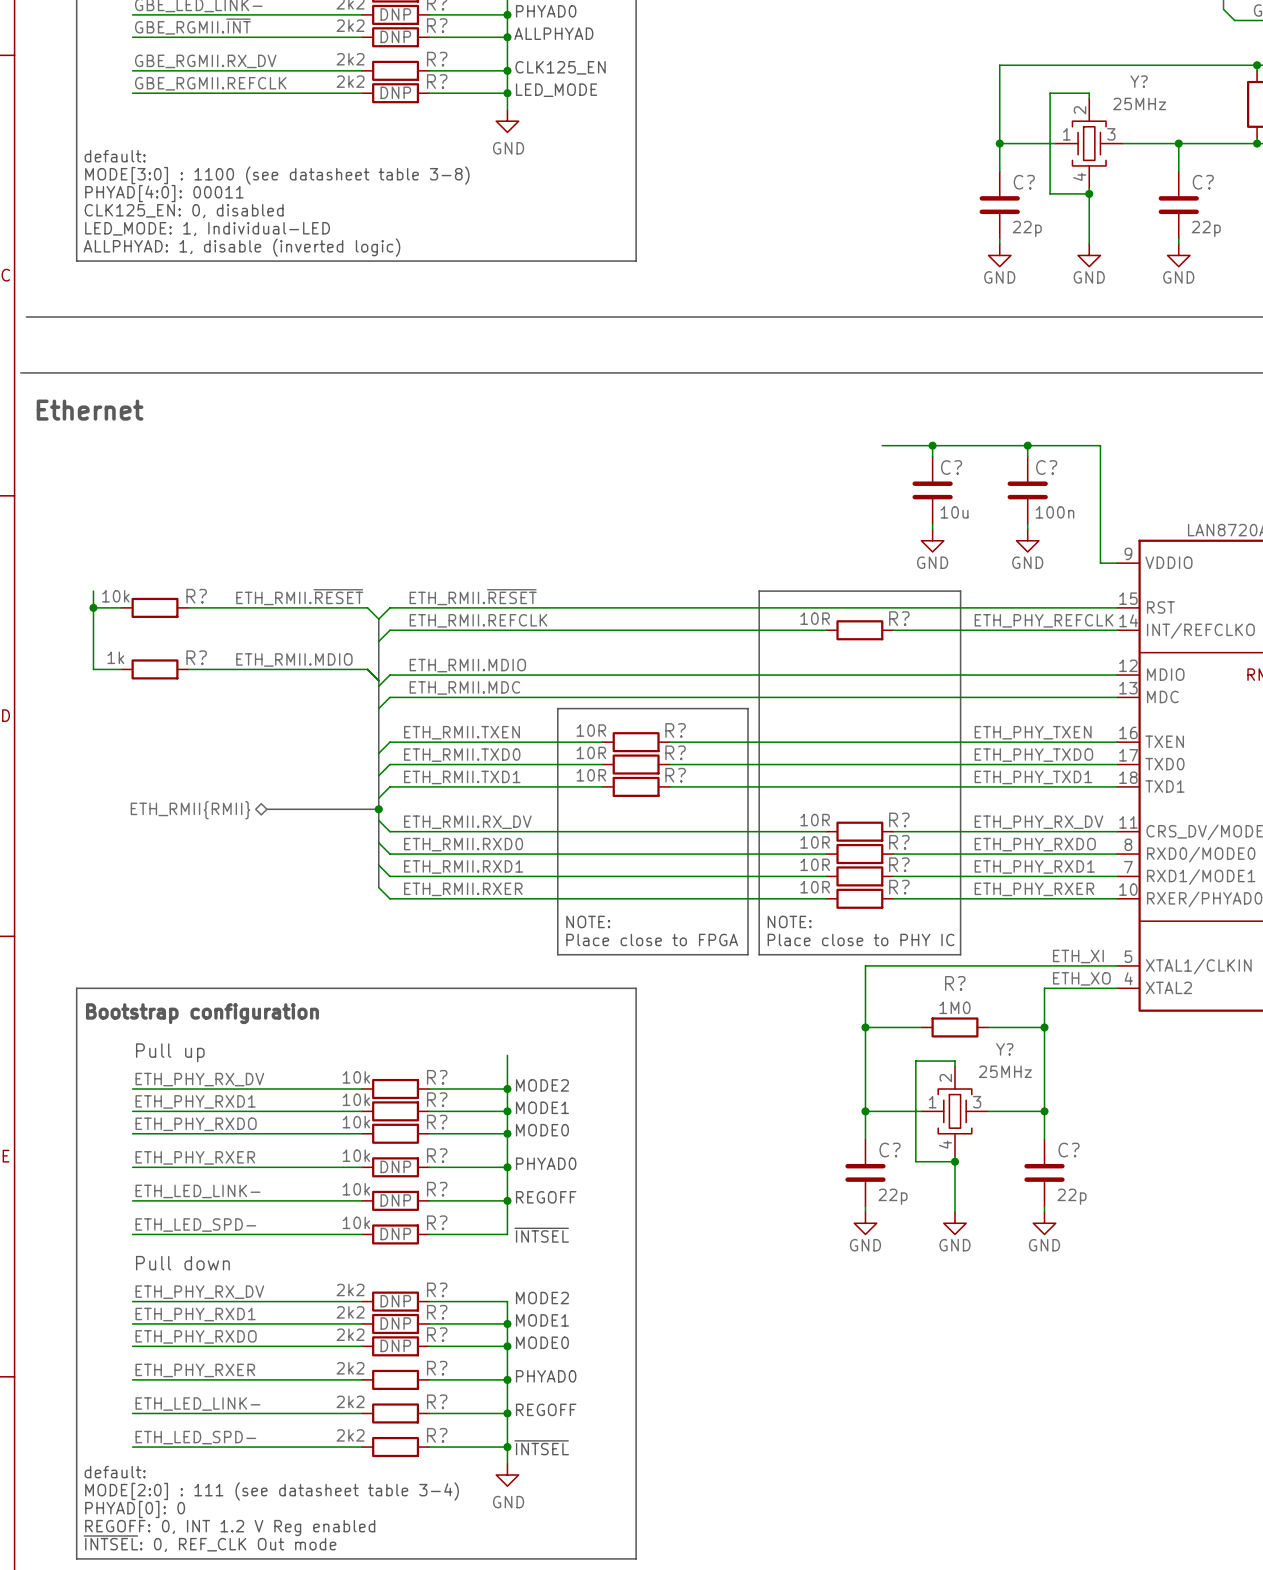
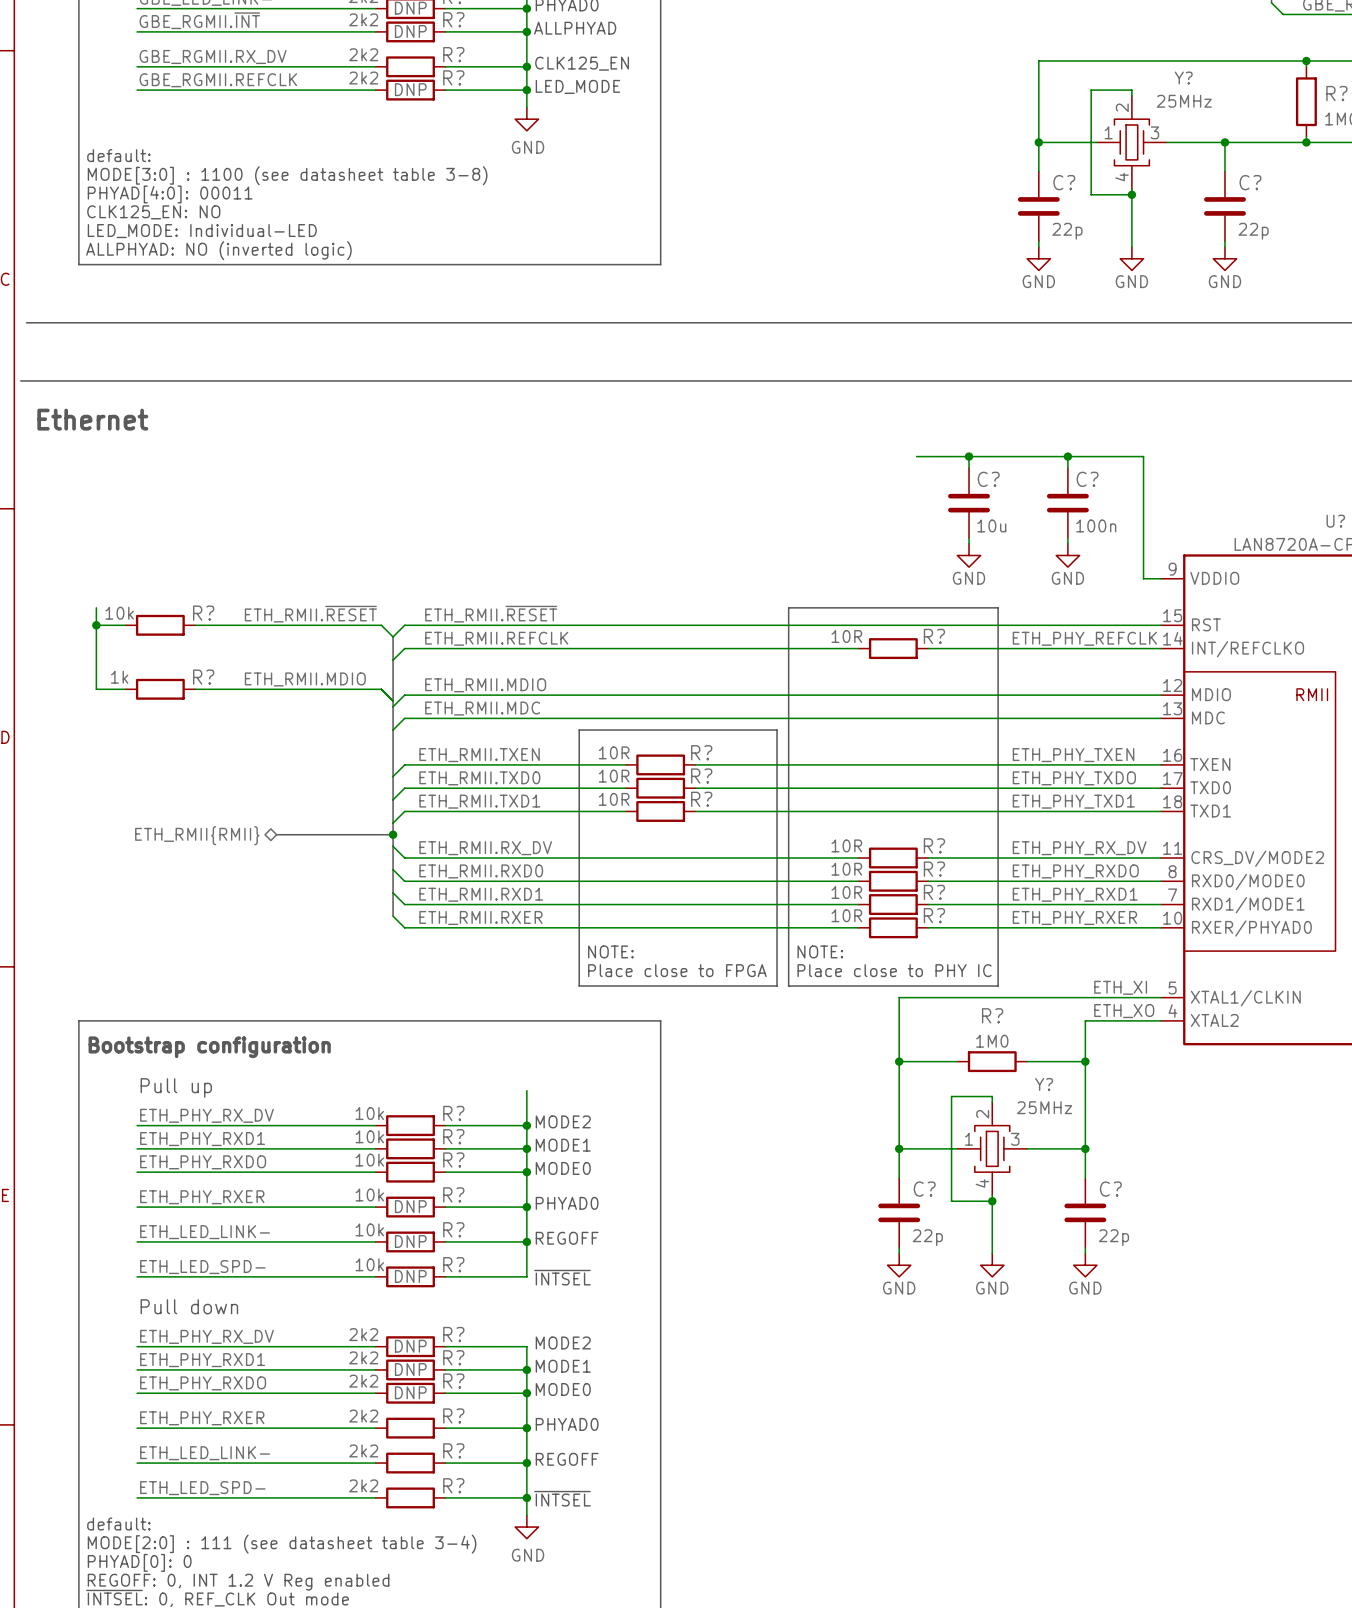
text: CLK125_EN: 0, disabled (184, 211) -> CLK125_EN: NO (153, 212)
text: LED_MODE: 1, Individual-LED (207, 229) -> LED_MODE: Individual-LED (202, 231)
text: ALLPHYAD: 1, disable (inverted logic) (241, 247) -> ALLPHYAD: NO (inverted logic) (218, 250)

